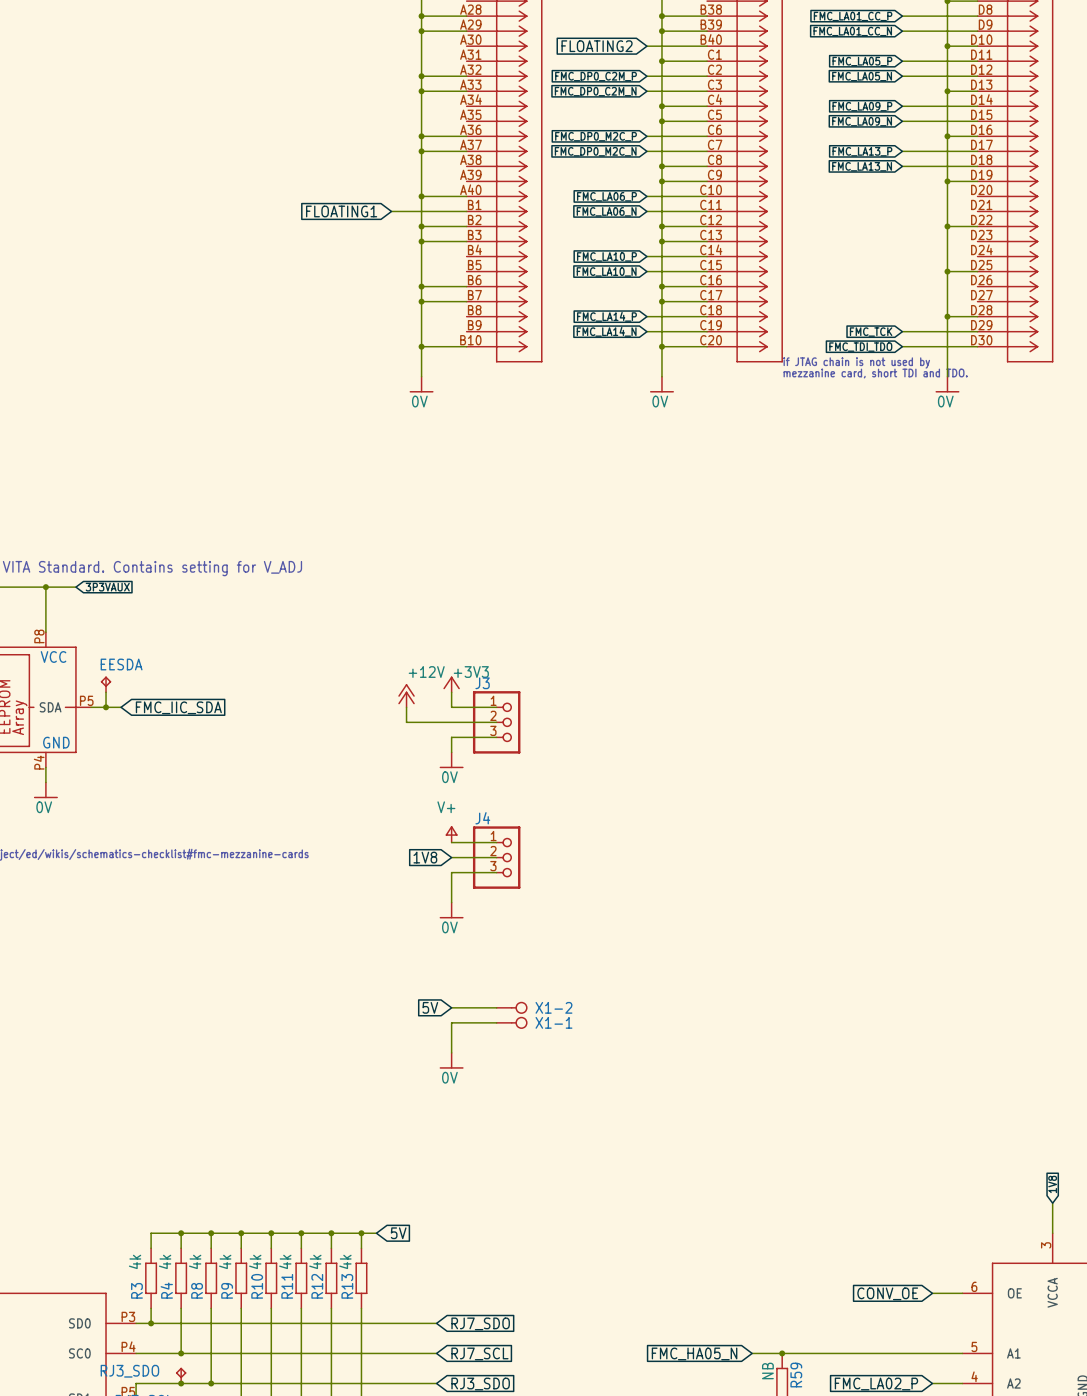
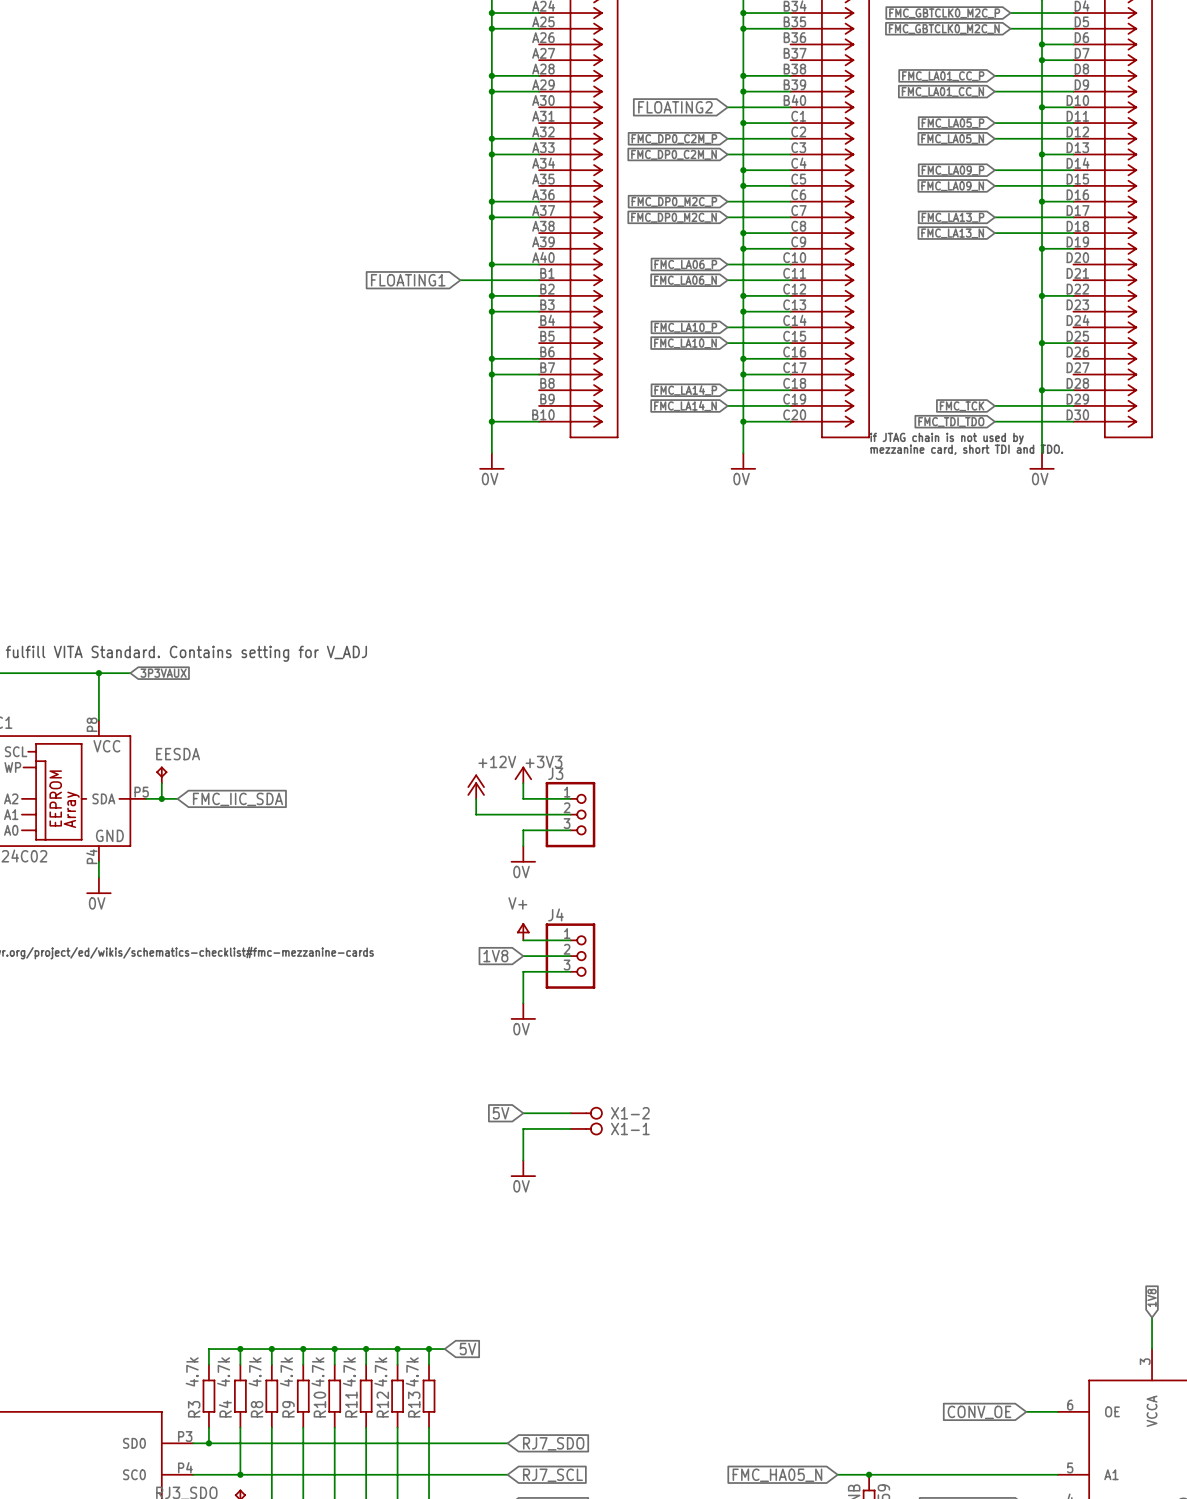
R3 value: 4k (135, 1261) -> 4.7k (192, 1371)
R4 value: 4k (165, 1261) -> 4.7k (223, 1371)
R8 value: 4k (195, 1261) -> 4.7k (255, 1371)
R9 value: 4k (225, 1261) -> 4.7k (286, 1371)
R10 value: 4k (255, 1261) -> 4.7k (317, 1371)
R11 value: 4k (285, 1261) -> 4.7k (349, 1371)
R12 value: 4k (315, 1261) -> 4.7k (380, 1371)
R13 value: 4k (345, 1261) -> 4.7k (412, 1371)

